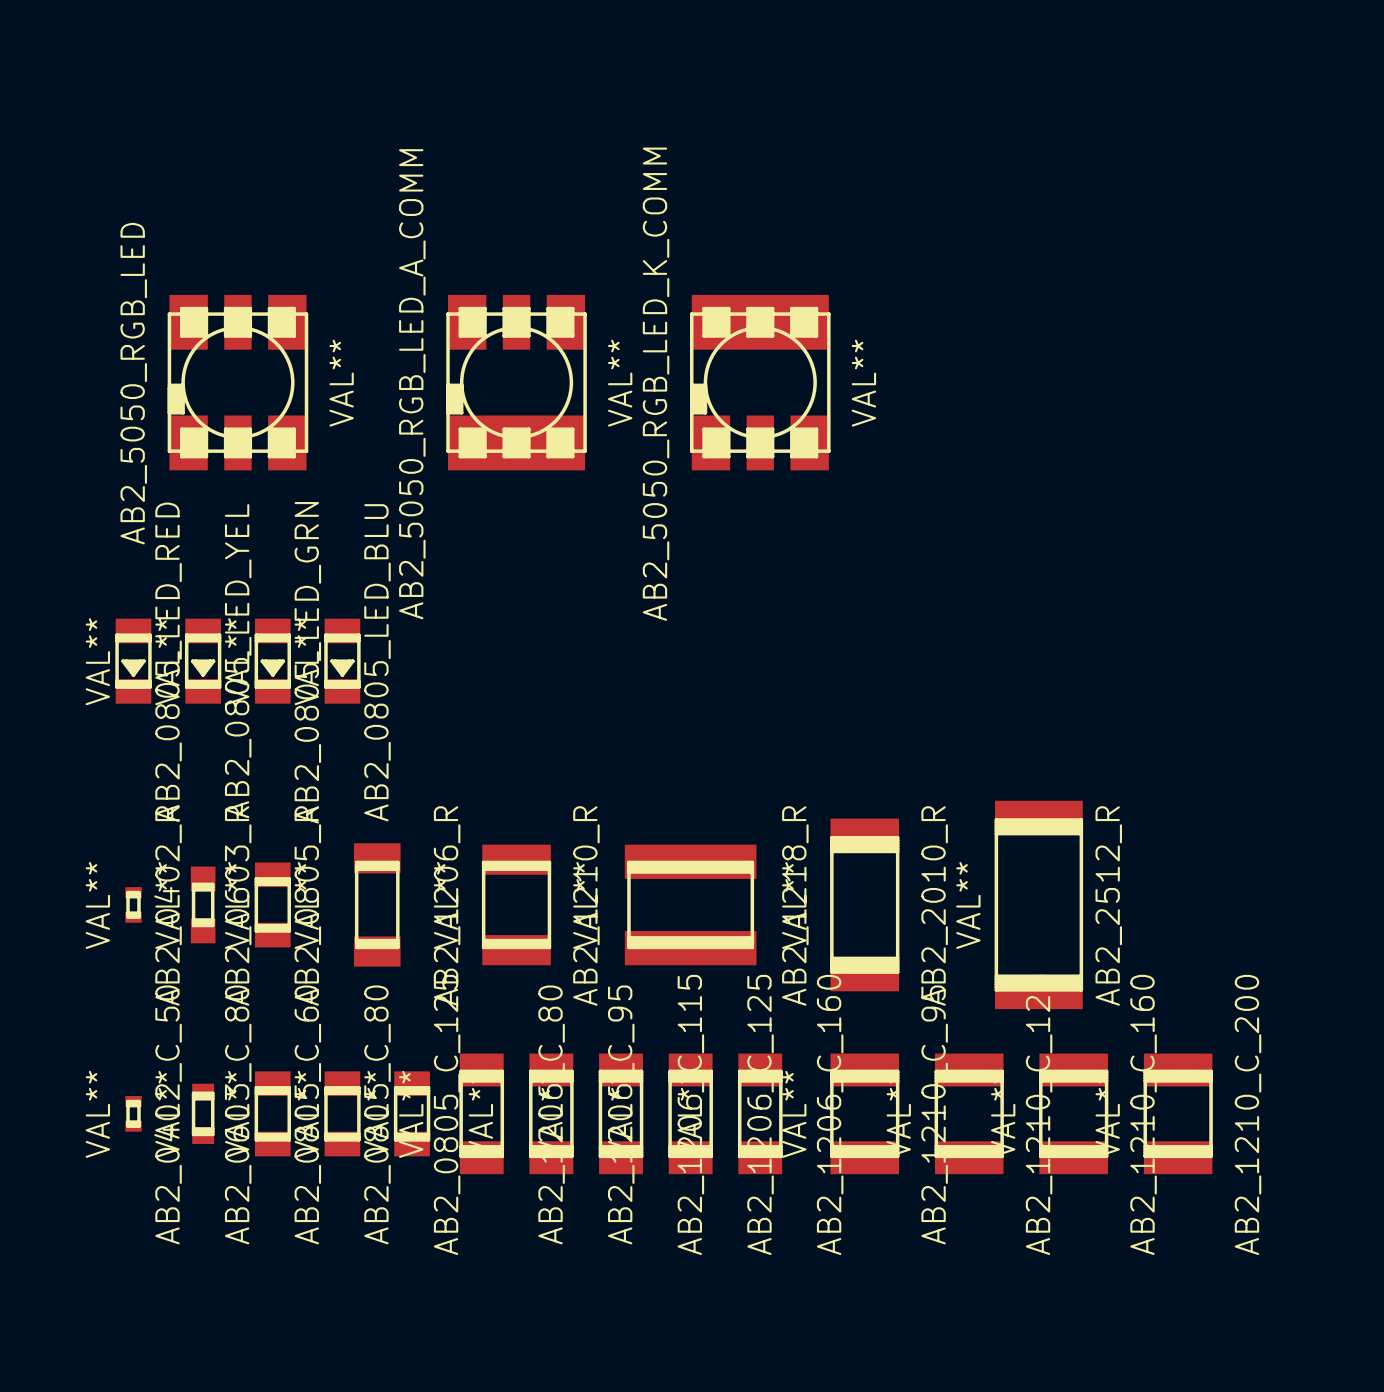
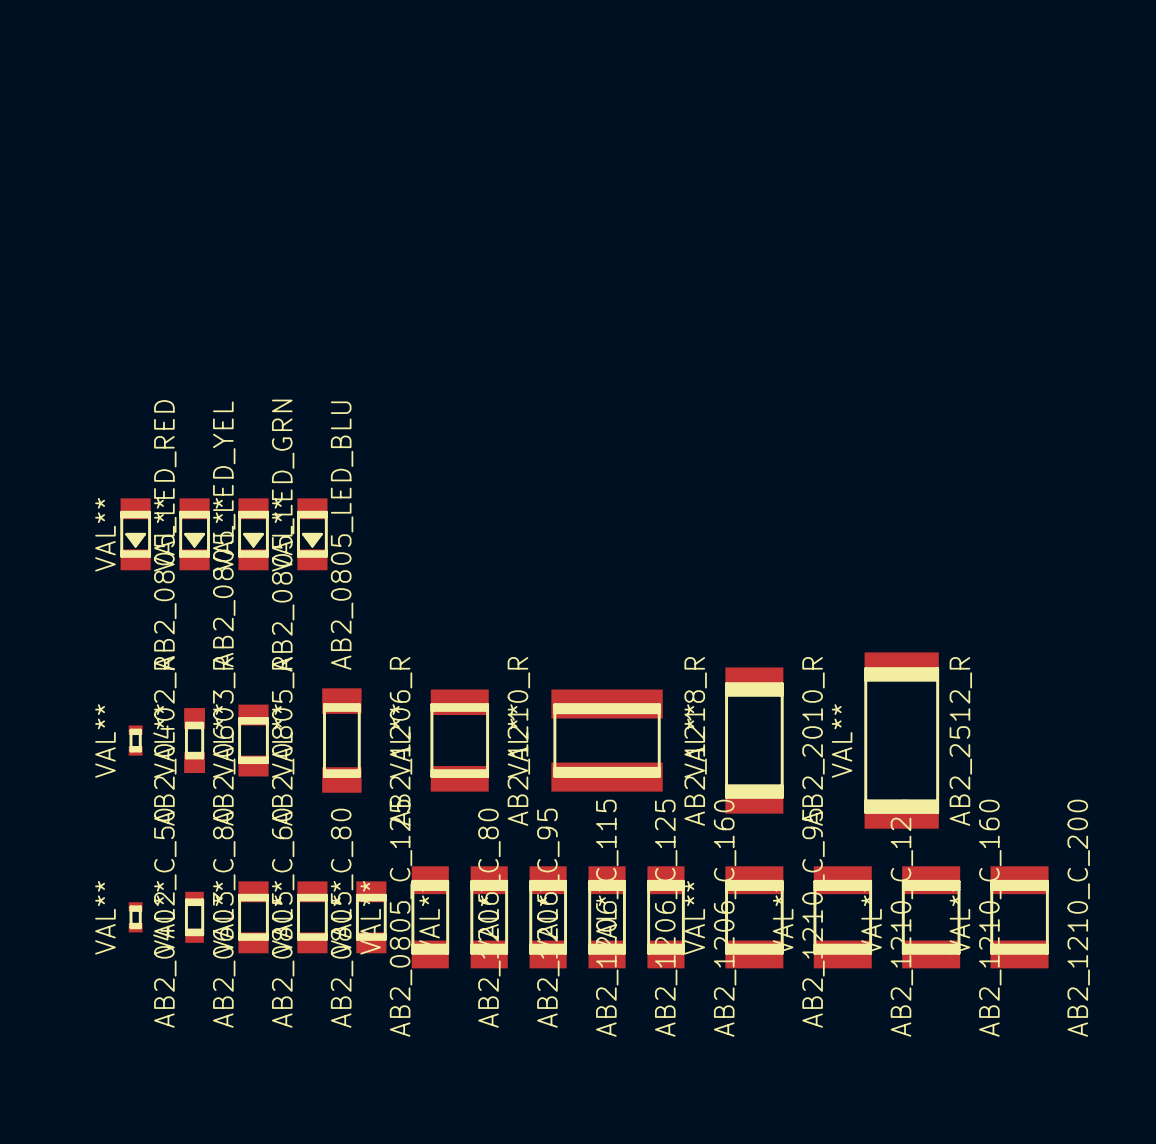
AB2_5050_RGB_LED: VAL** (237, 382) -> none
AB2_5050_RGB_LED_A_COMM: VAL** (516, 382) -> none
AB2_5050_RGB_LED_K_COMM: VAL** (760, 382) -> none

